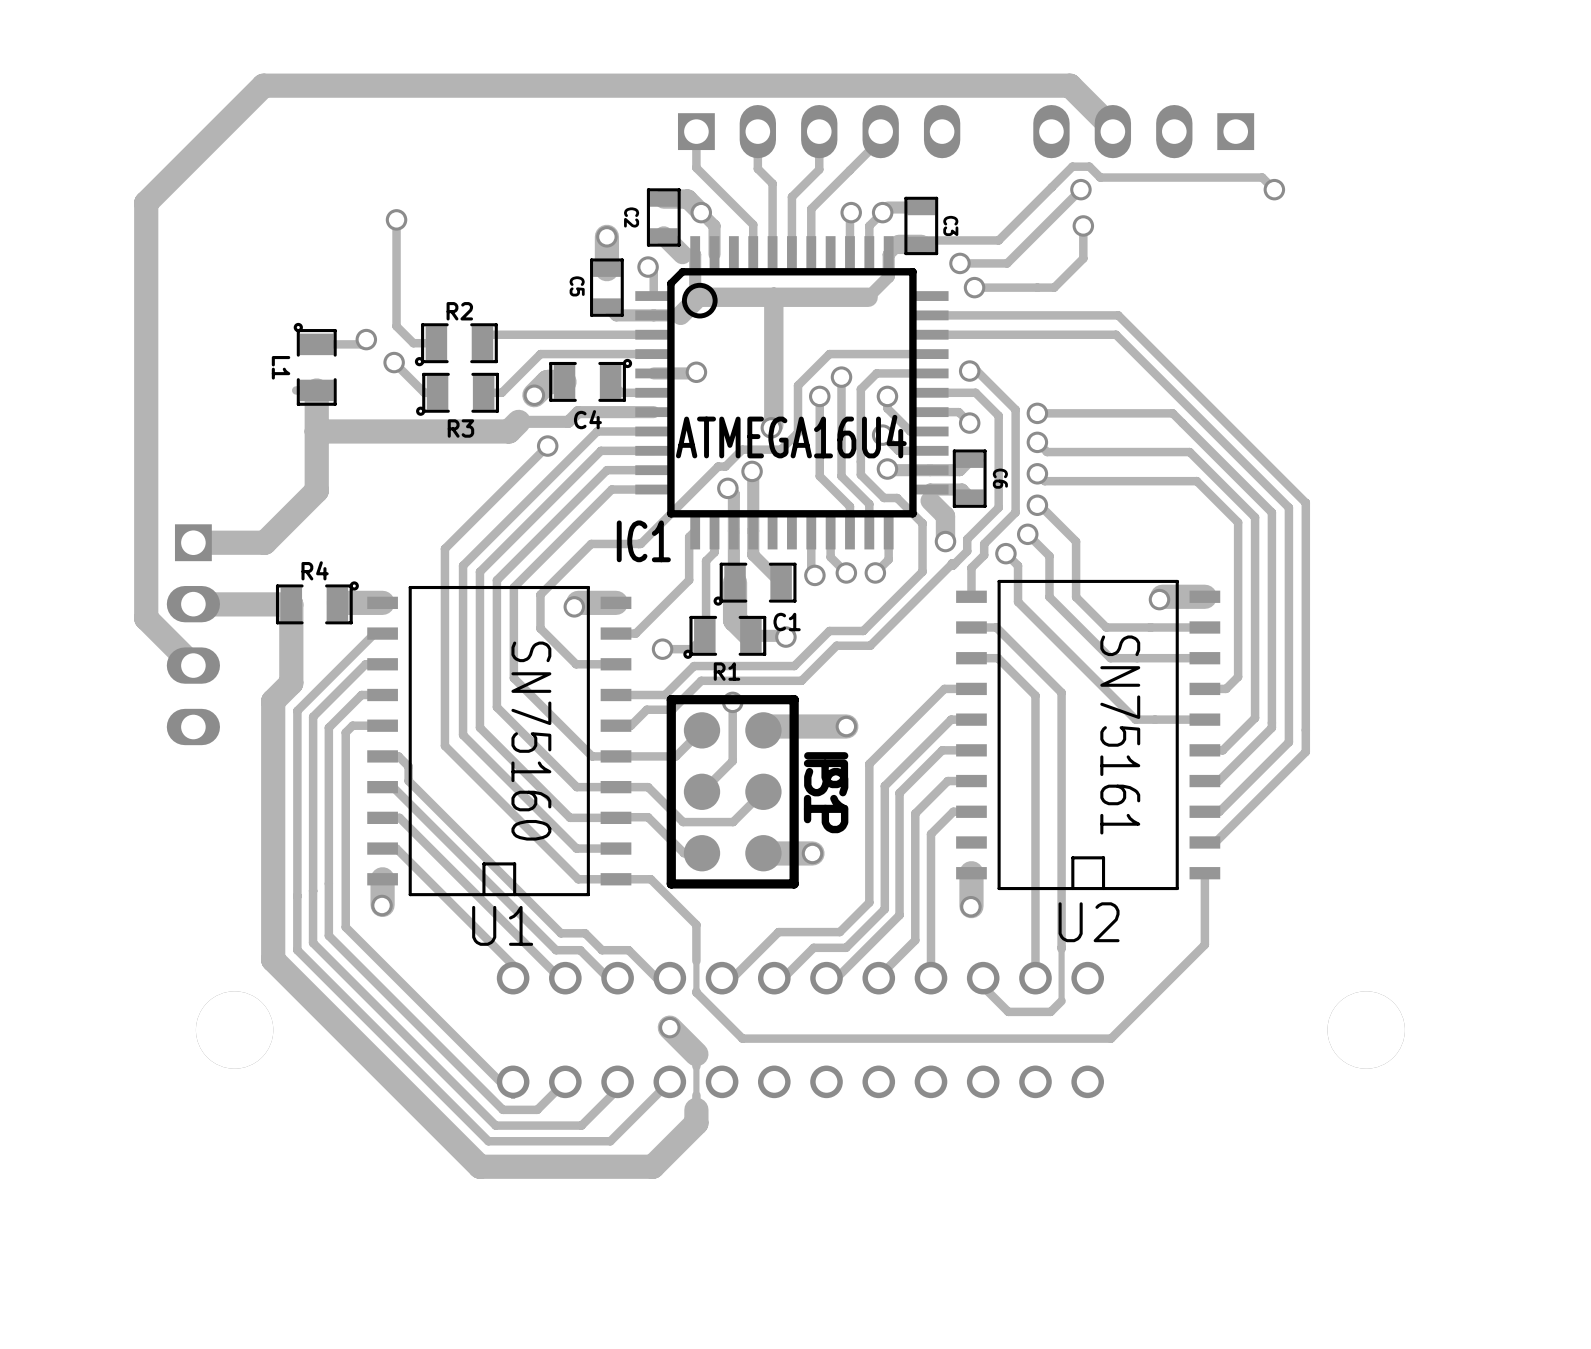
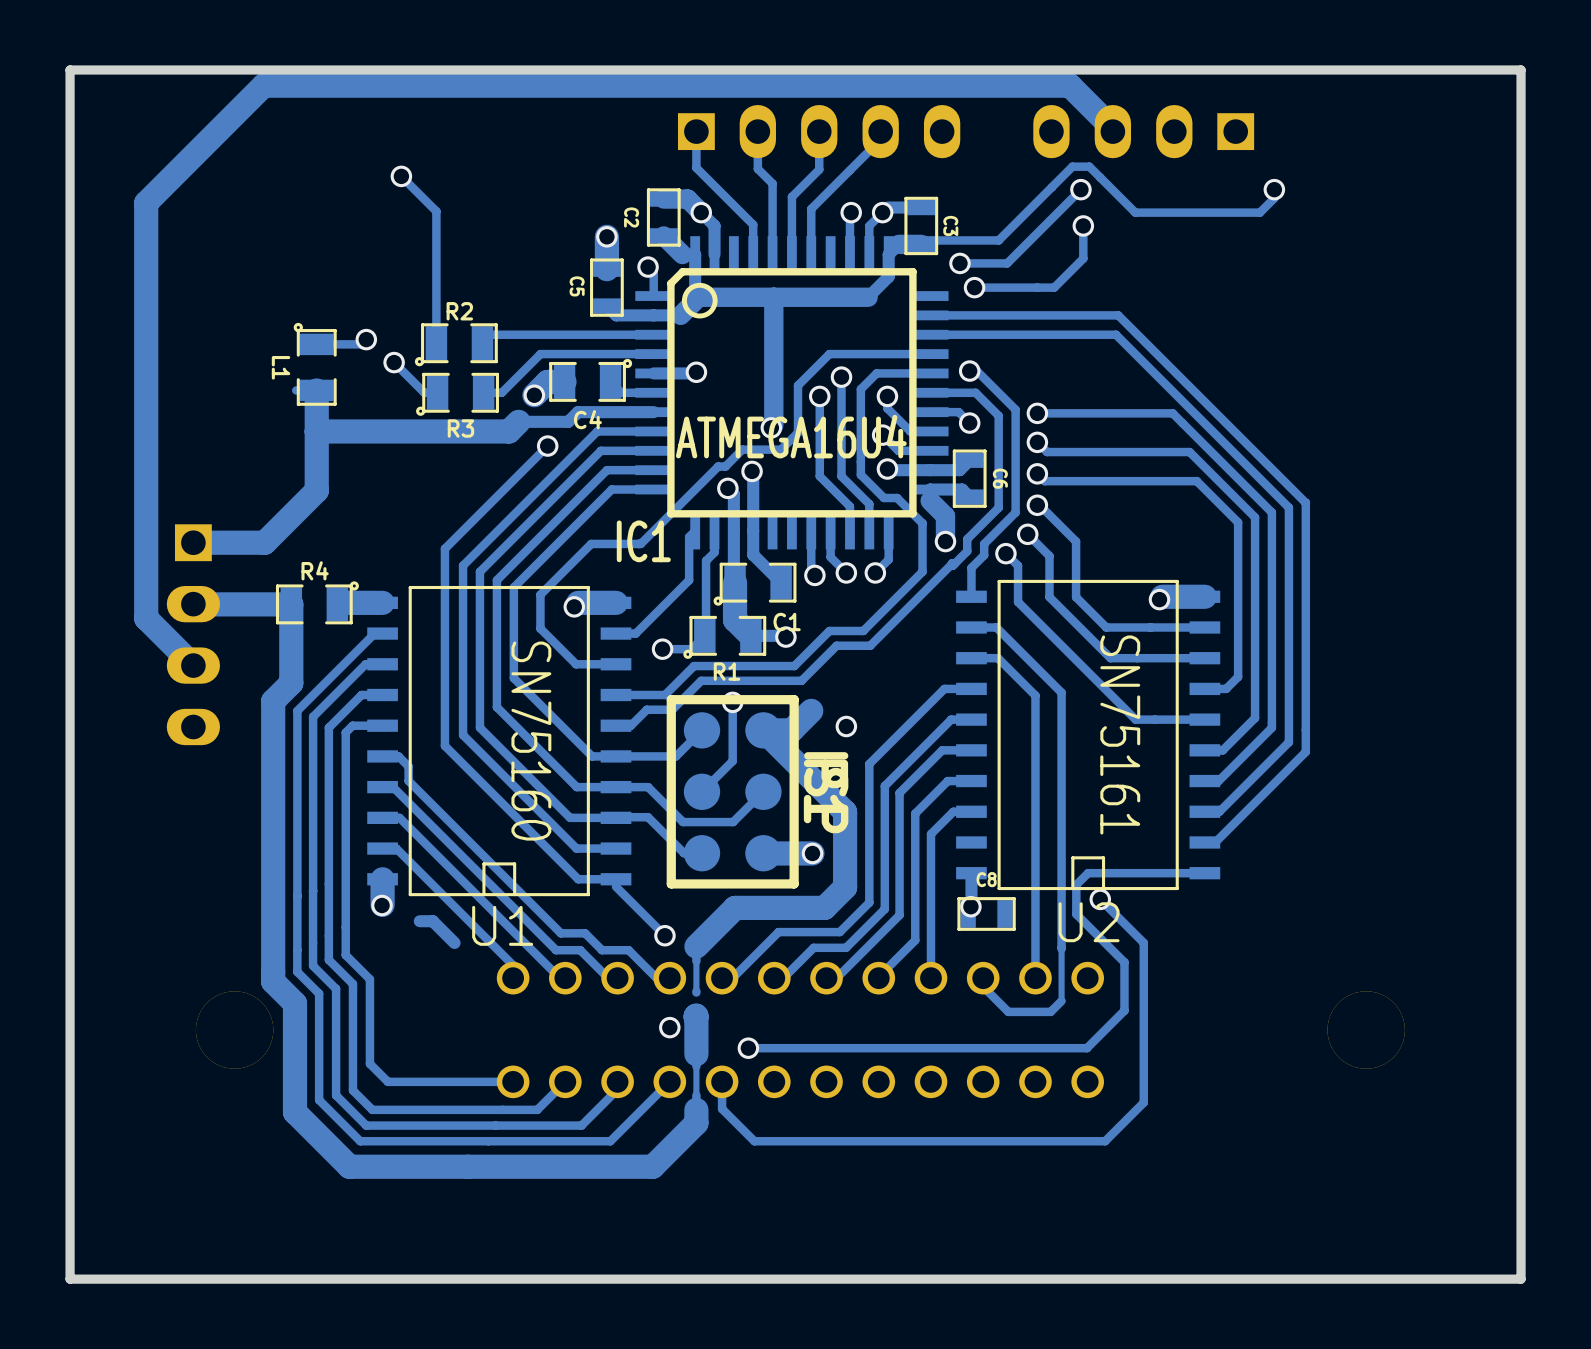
board edge: none -> (1521, 70) (1521, 1279) (70, 1279) (70, 70) (1521, 70)
track: (1100, 177) (1262, 177) (1274, 189) -> (1100, 177) (1135, 212) (1259, 212) (1274, 198) (1274, 189)
track: (396, 219) (396, 326) (413, 343) (436, 343) -> (401, 176) (436, 211) (436, 343)
via position: (396, 219) -> (401, 176)
track: none -> (811, 710) (791, 730) (763, 730) (845, 812) (845, 887) (824, 907) (735, 907) (696, 946)
track: (846, 726) (767, 726) (763, 730) -> none
track width: thick (971, 873) (971, 906) -> thin (971, 873) (971, 906)
track: (1204, 873) (1204, 944) (1111, 1038) (742, 1038) (696, 992) -> (1204, 873) (1088, 873) (1076, 884) (1076, 914) (1124, 962) (1124, 1010) (1086, 1048) (748, 1048)
track: (616, 879) (650, 879) (696, 924) (696, 946) -> (616, 879) (616, 886) (664, 935)
track: none -> (1100, 899) (1143, 942) (1143, 1102) (1105, 1141) (754, 1141) (722, 1108) (722, 1081)
via: none -> (1100, 899)
C8: none -> (986, 913)
track: none -> (419, 921) (432, 921) (454, 942)
track: (345, 927) (513, 1094) (513, 1081) (523, 1081) -> (345, 927) (345, 955) (369, 979) (369, 1063) (387, 1081) (513, 1081)
track: (328, 935) (502, 1109) -> (328, 935) (328, 959) (352, 984) (352, 1090) (372, 1109) (502, 1109)
via: none -> (664, 935)
track: (313, 942) (495, 1125) -> none
track: (297, 950) (313, 965) -> (313, 942) (313, 965)
track: none -> (297, 950) (297, 971) (319, 993) (319, 1100) (360, 1141) (488, 1141)
track: (273, 959) (480, 1166) -> (273, 959) (273, 981) (295, 1003) (295, 1112) (349, 1166) (480, 1166)
track: (336, 988) (488, 1141) -> (336, 988) (336, 1095) (366, 1125) (495, 1125)
track: (669, 1027) (696, 1054) -> (696, 1015) (696, 1054)
via: none -> (748, 1048)

